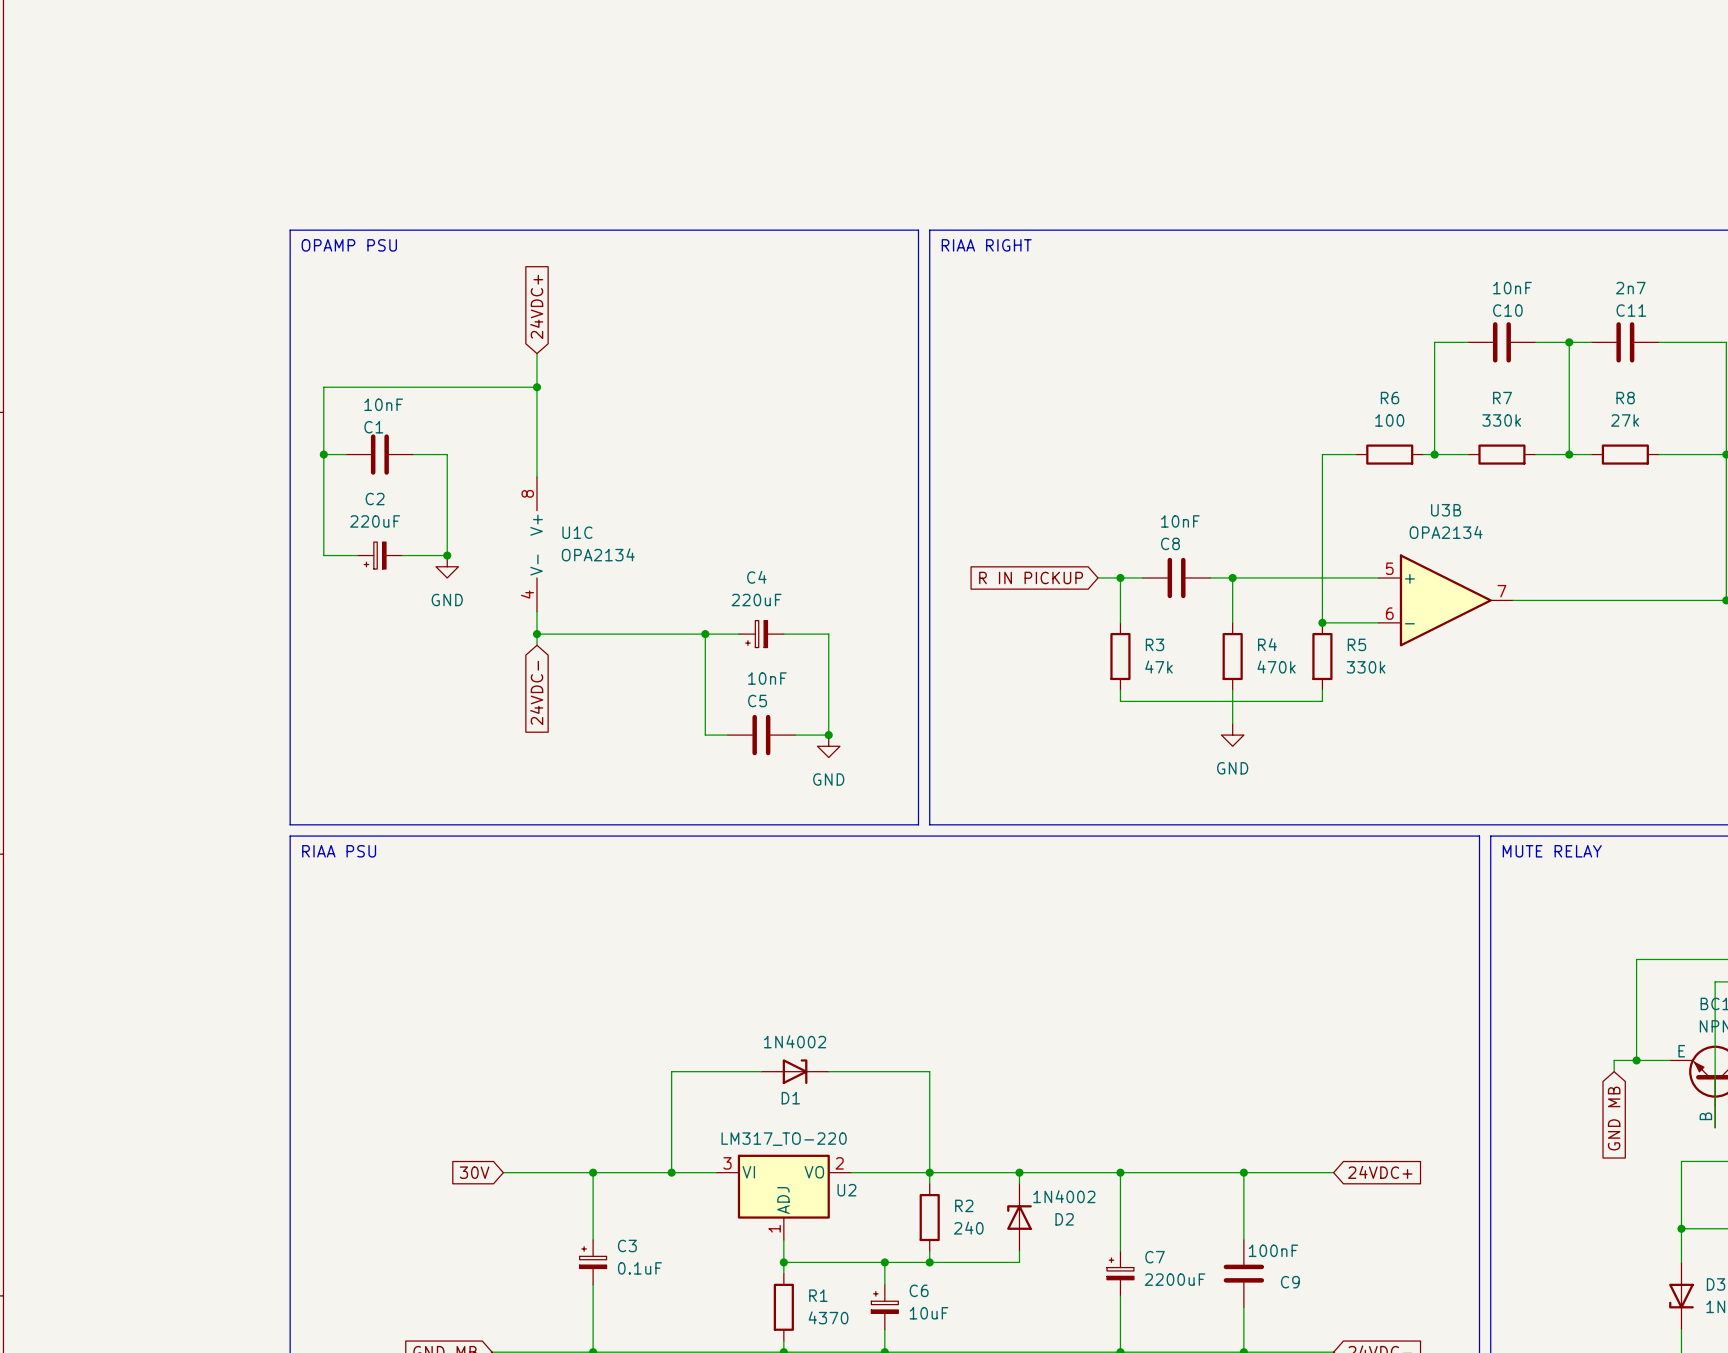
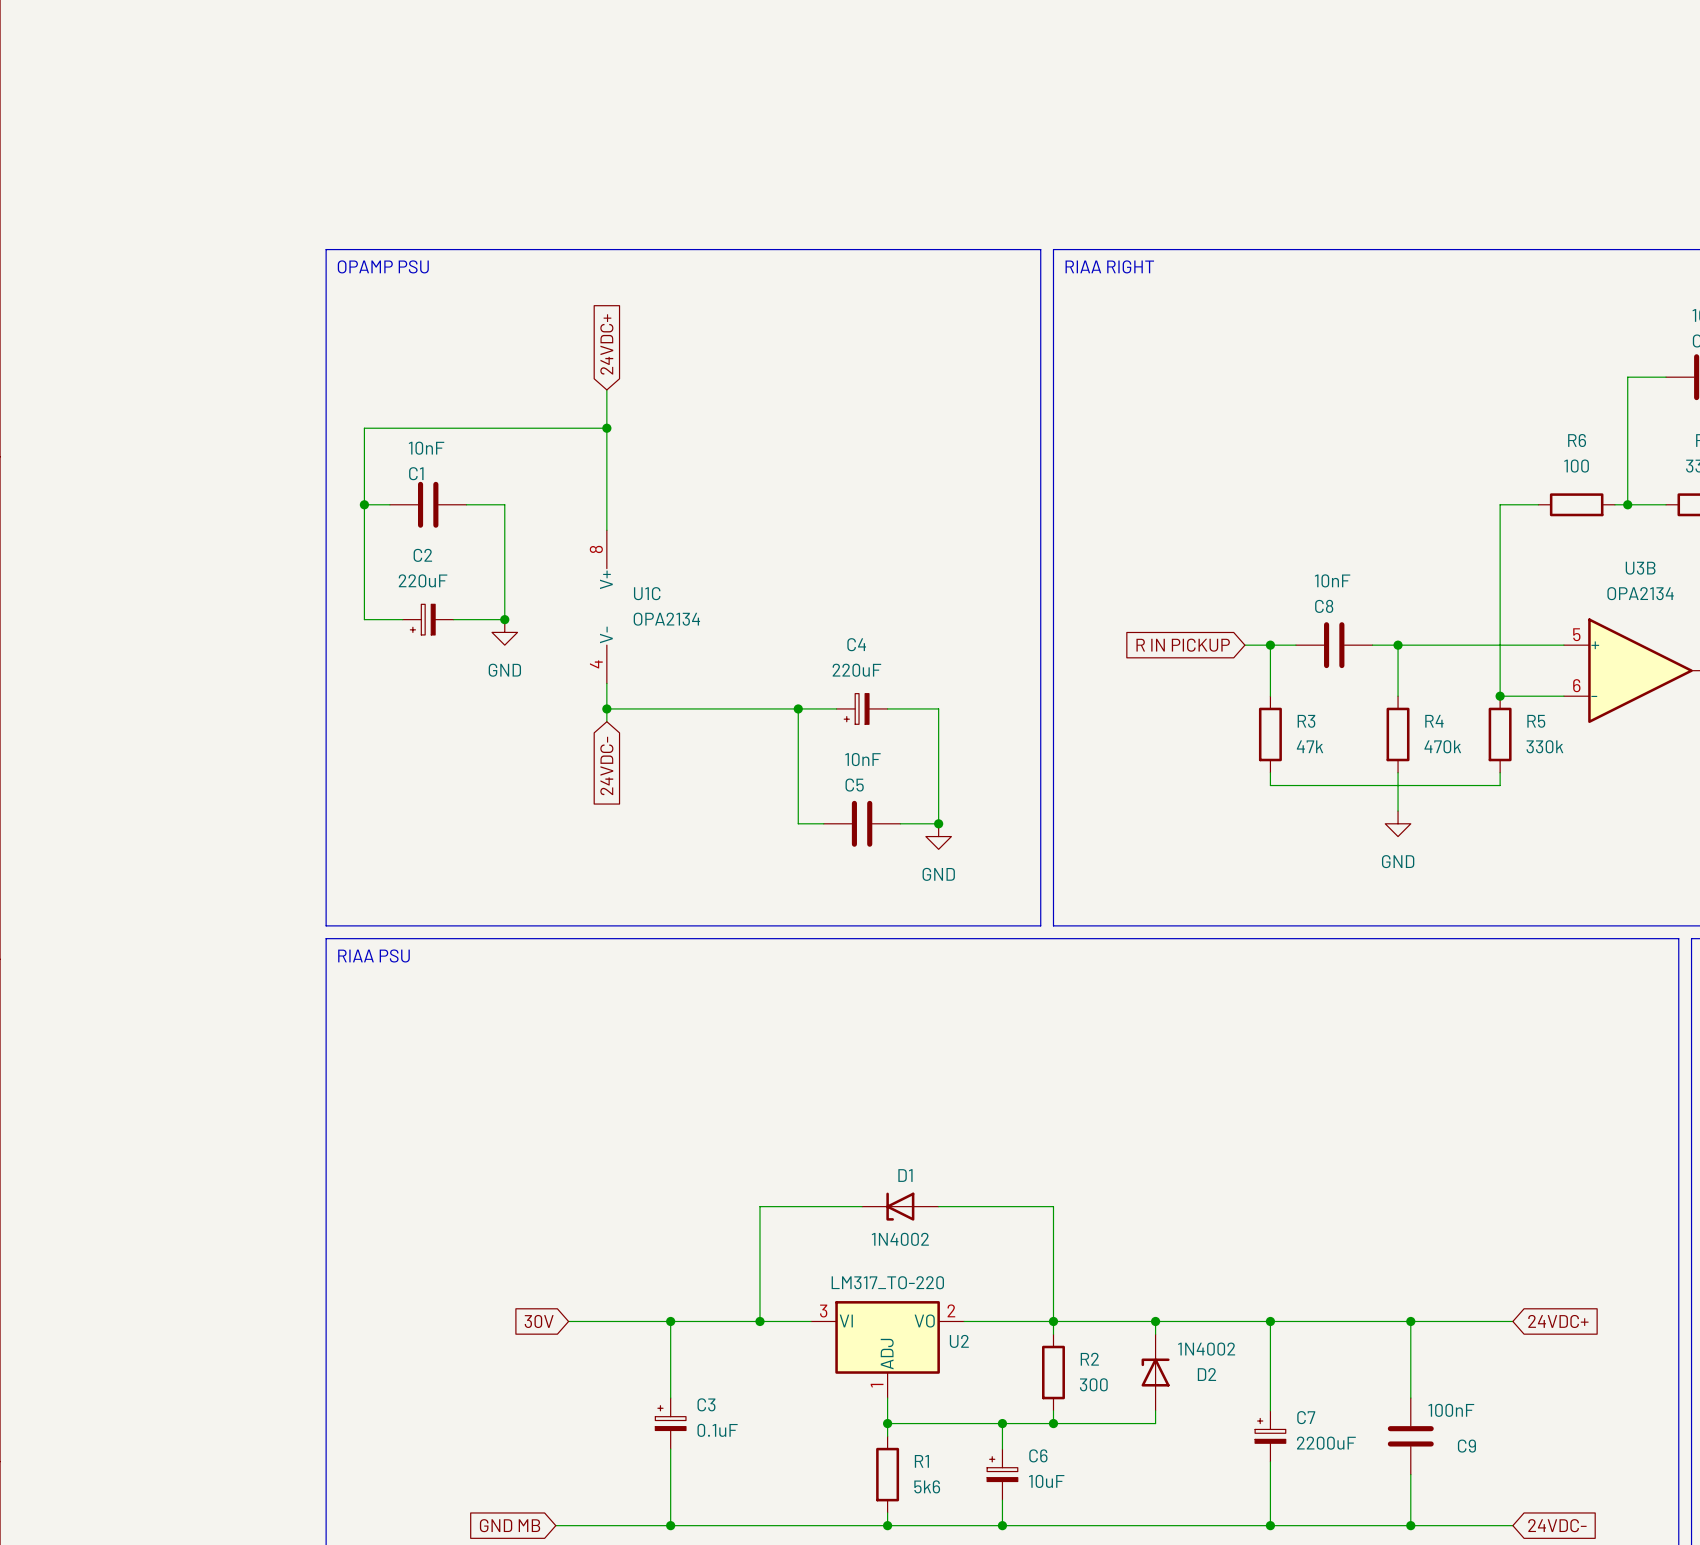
D1 rotation: 0° (795, 1071) -> 180° (900, 1206)
R2 value: 240 (968, 1228) -> 300 (1093, 1384)
R1 value: 4370 (828, 1317) -> 5k6 (927, 1486)

